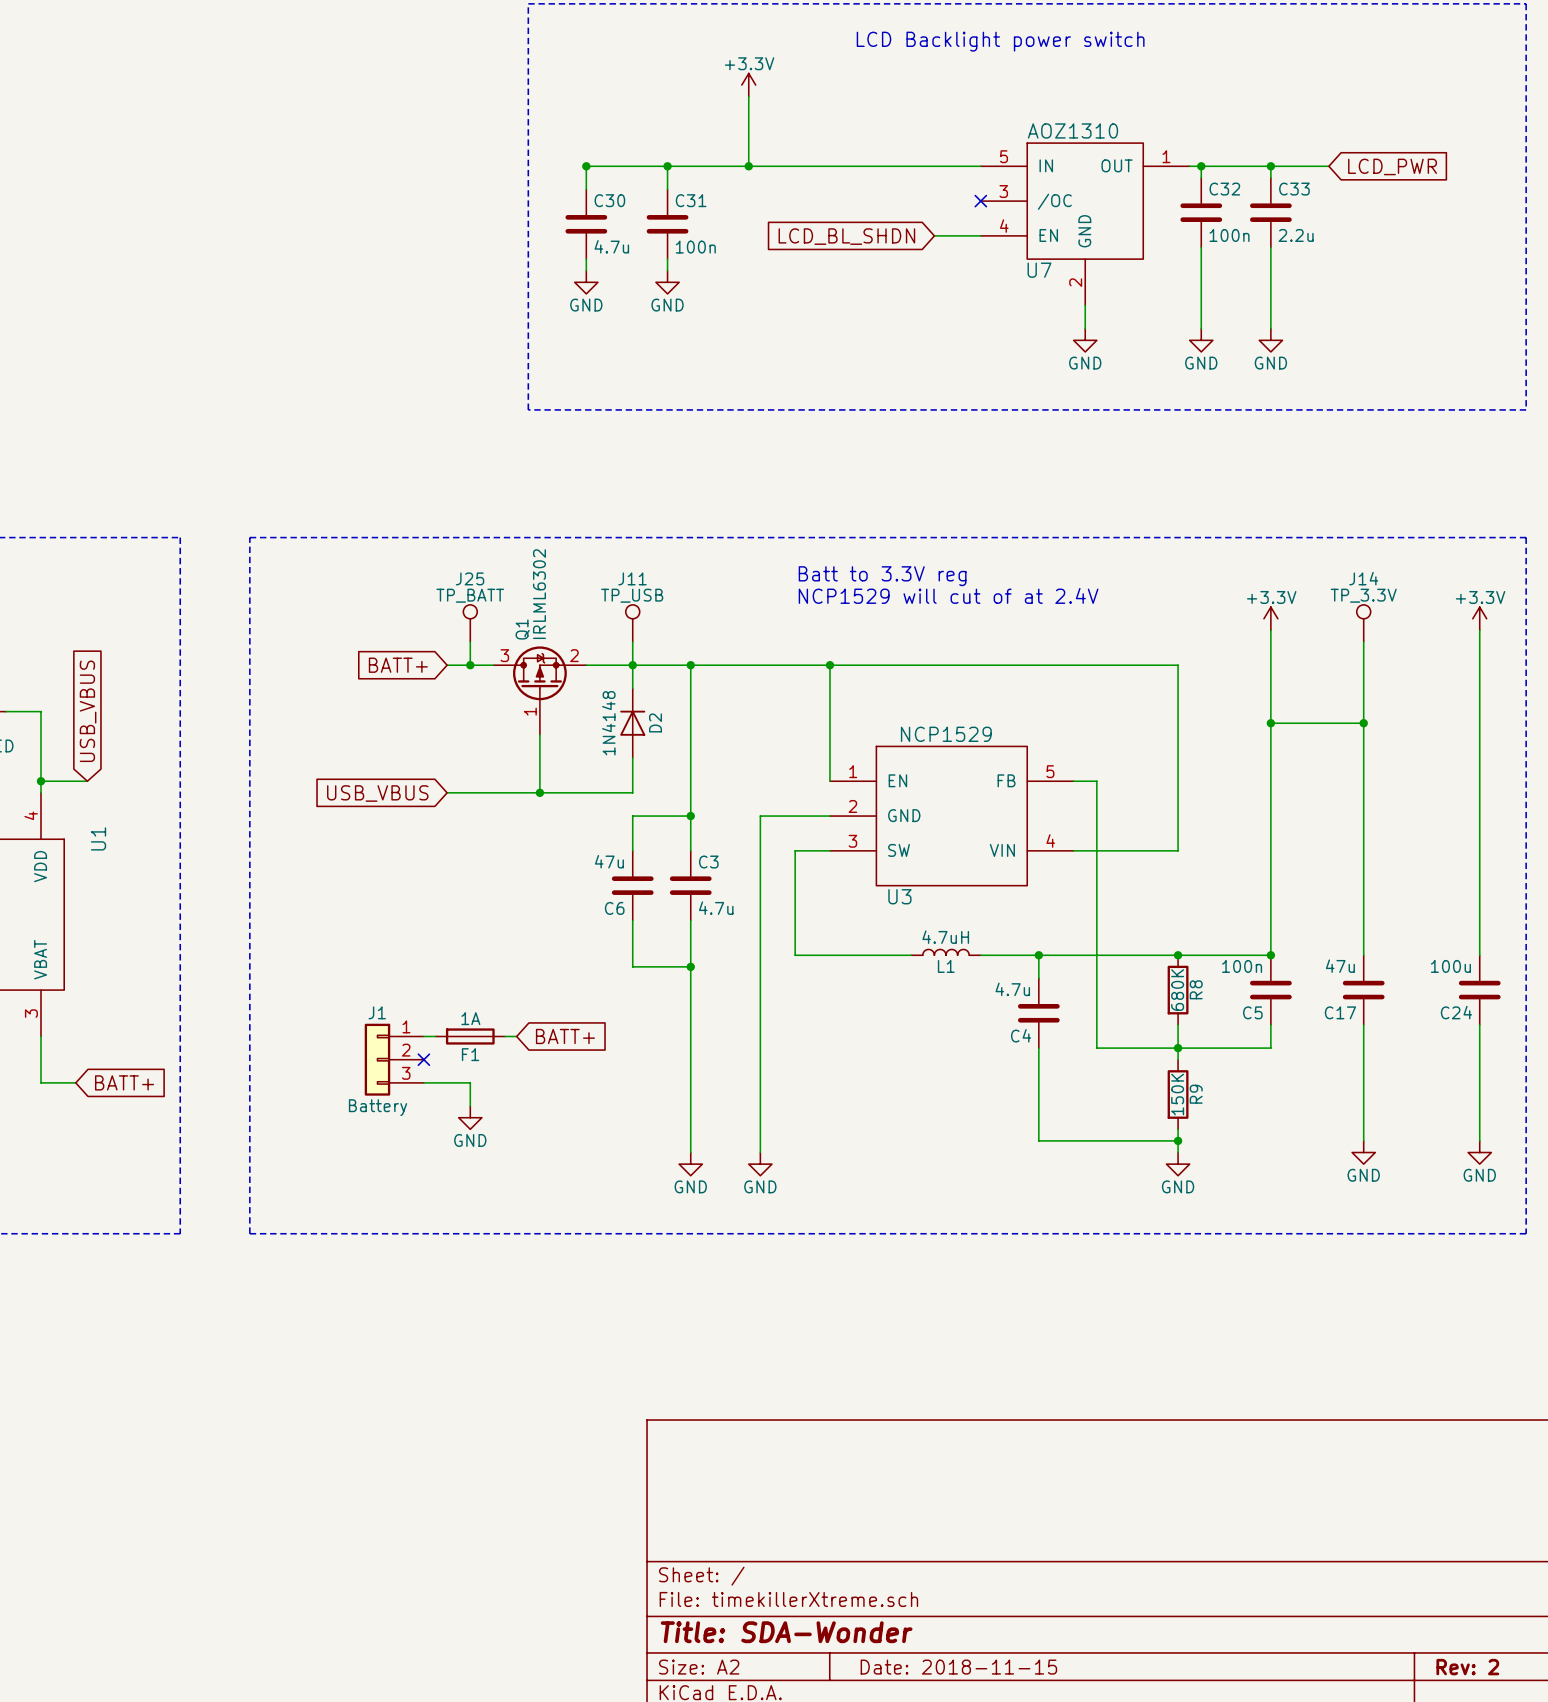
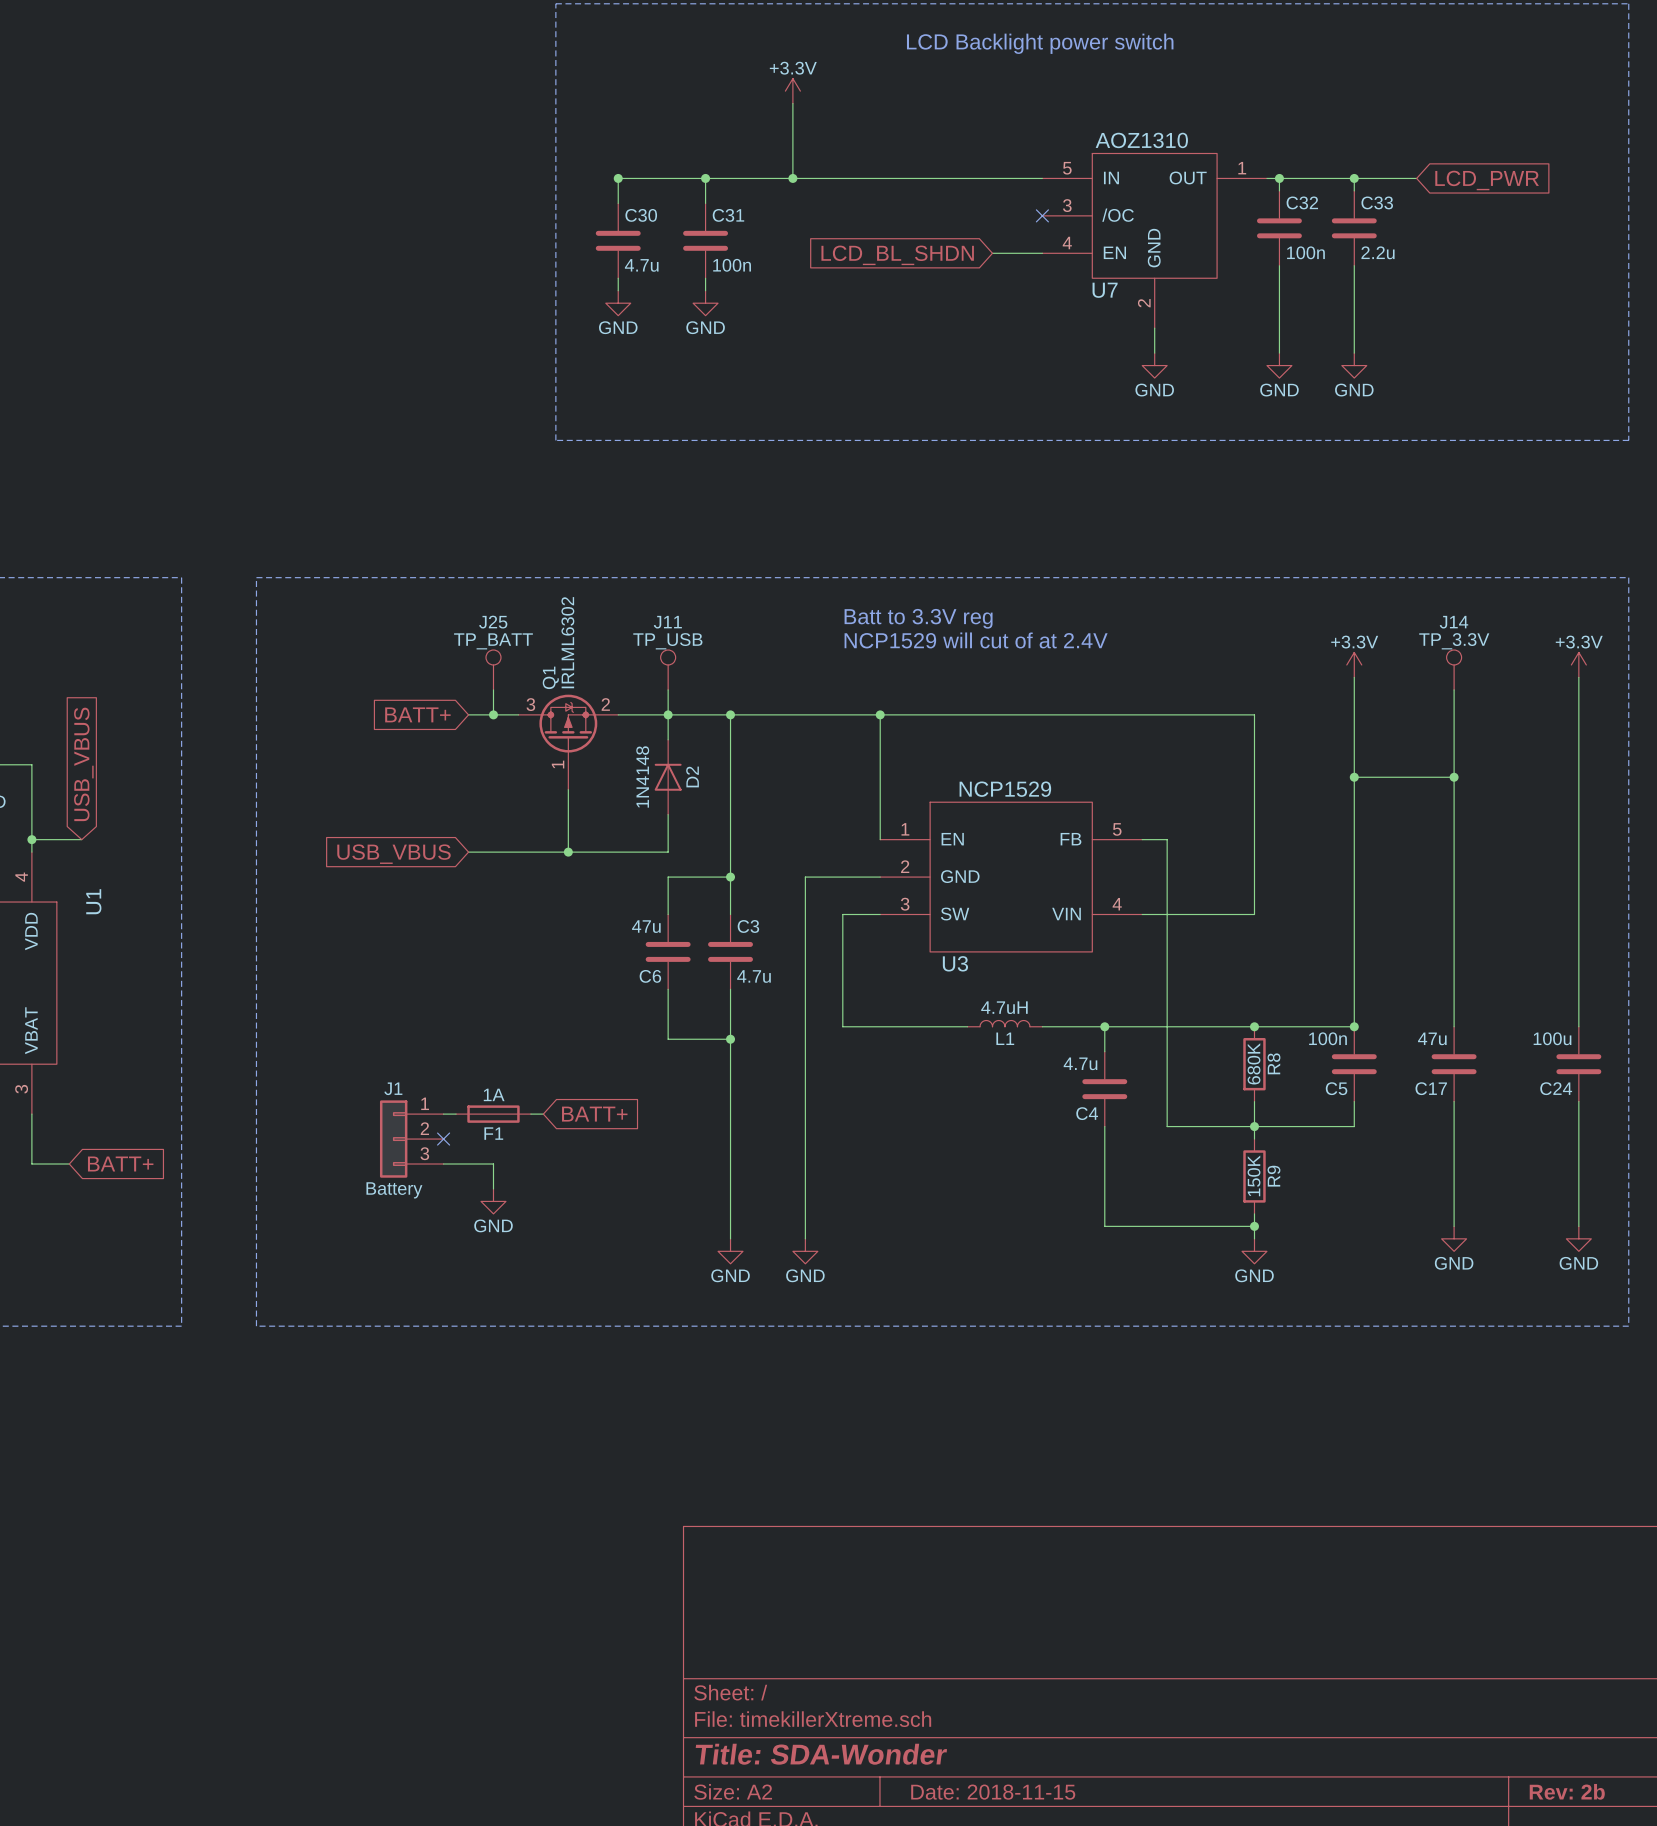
title block: Rev: 2 (1467, 1667) -> Rev: 2b (1567, 1791)

